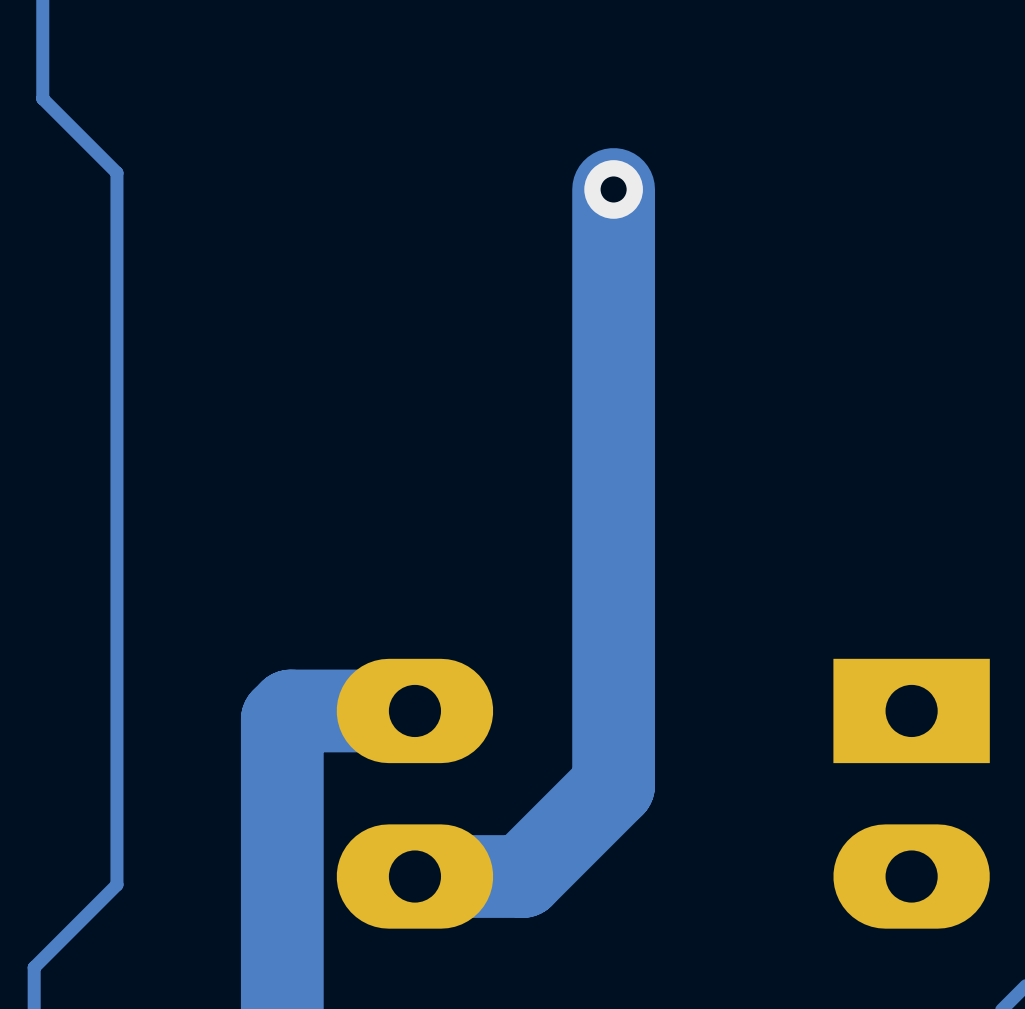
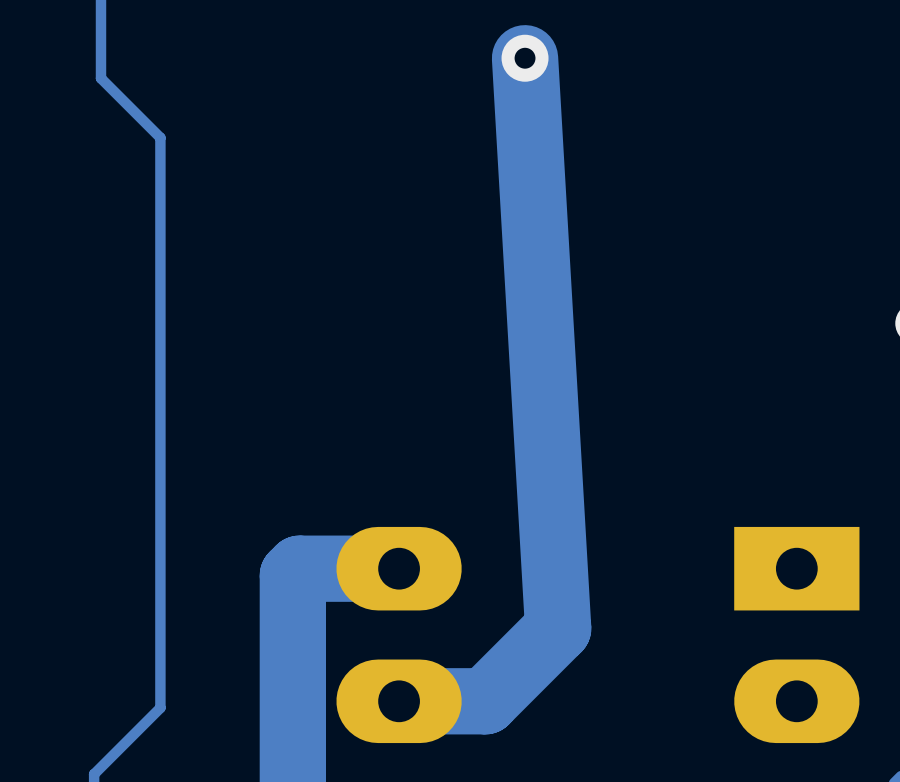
track: (613, 189) (613, 785) -> (525, 58) (558, 628)
via position: (613, 189) -> (525, 58)

